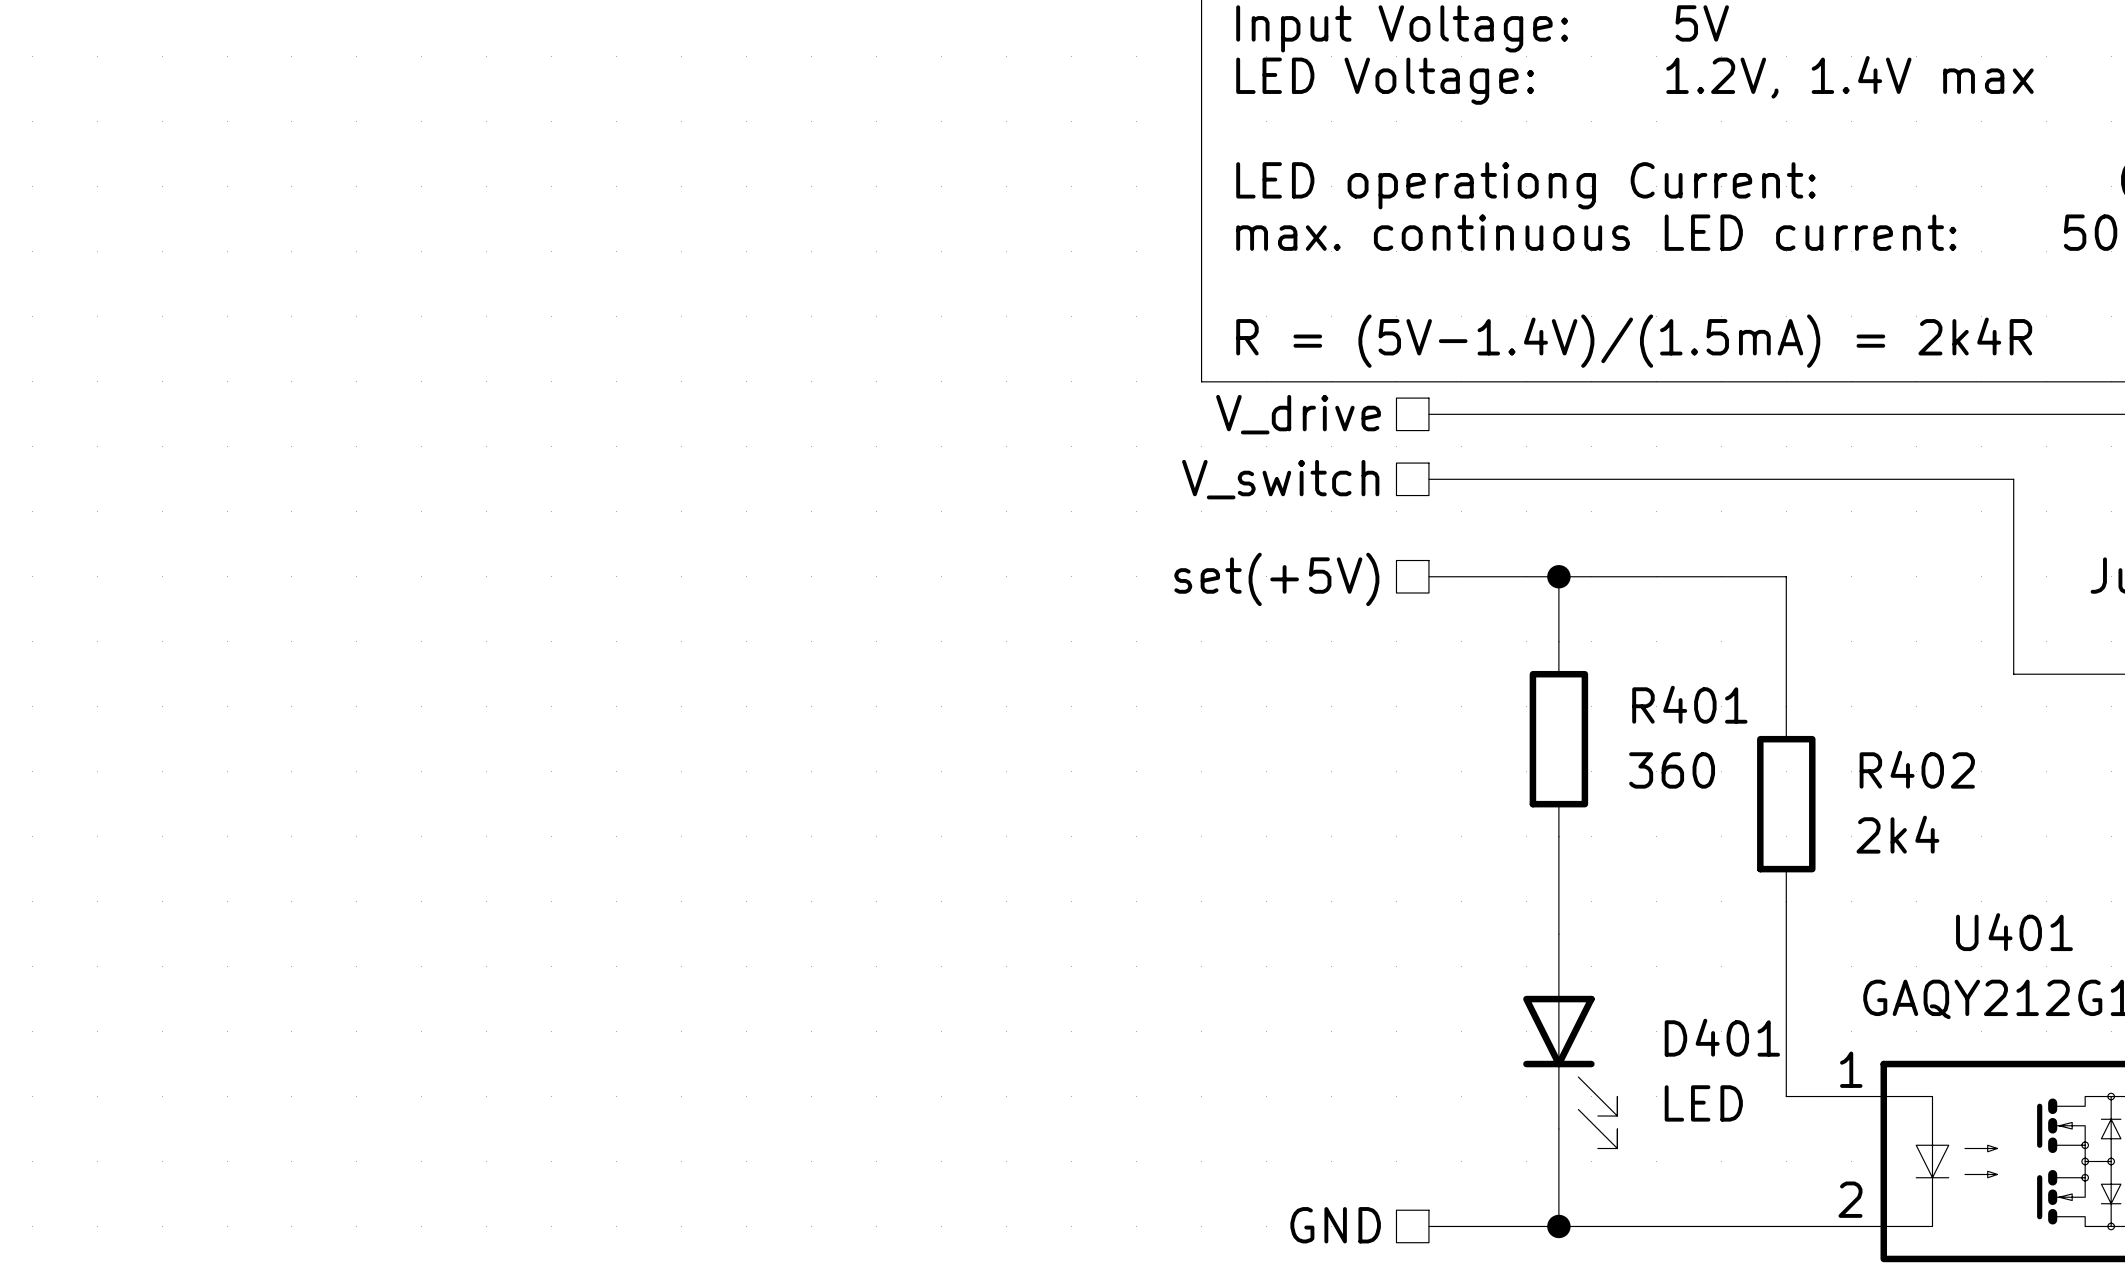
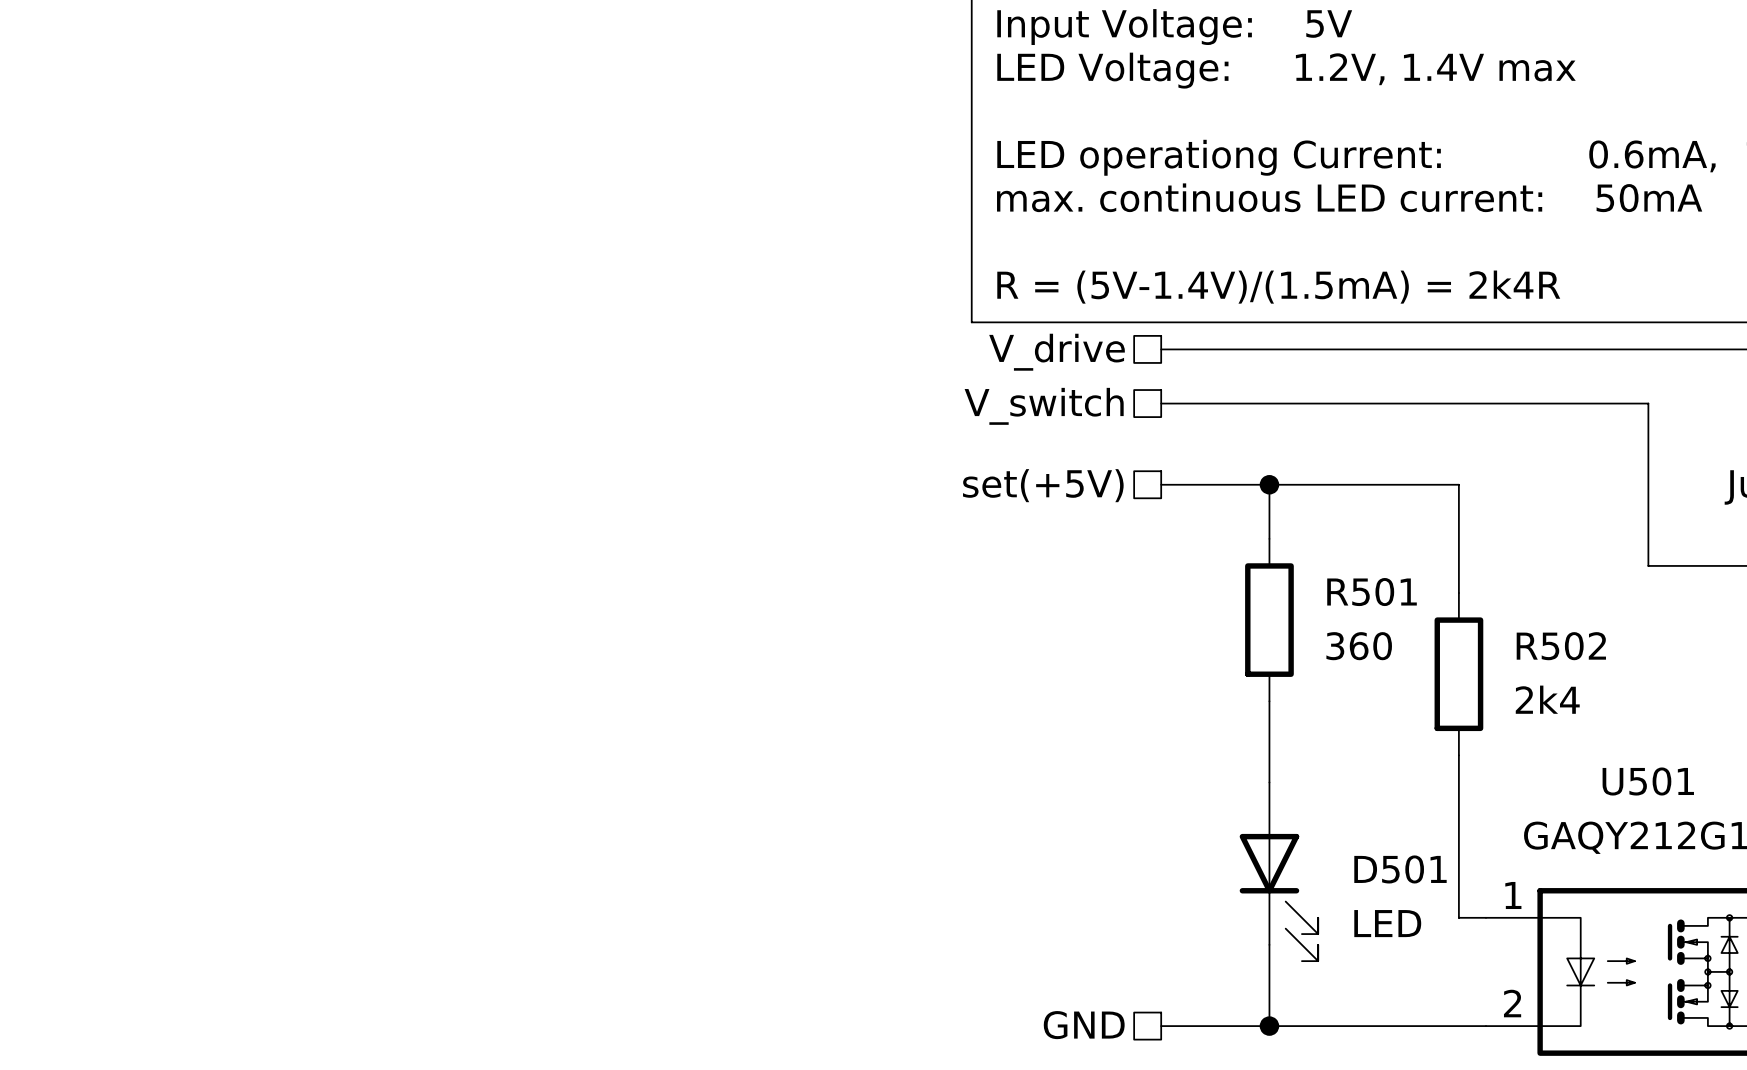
R401 name: R401 (1689, 704) -> R501 (1372, 592)
R402 name: R402 (1917, 769) -> R502 (1561, 646)
U401 name: U401 (2014, 932) -> U501 (1648, 781)
D401 name: D401 (1722, 1037) -> D501 (1400, 869)

